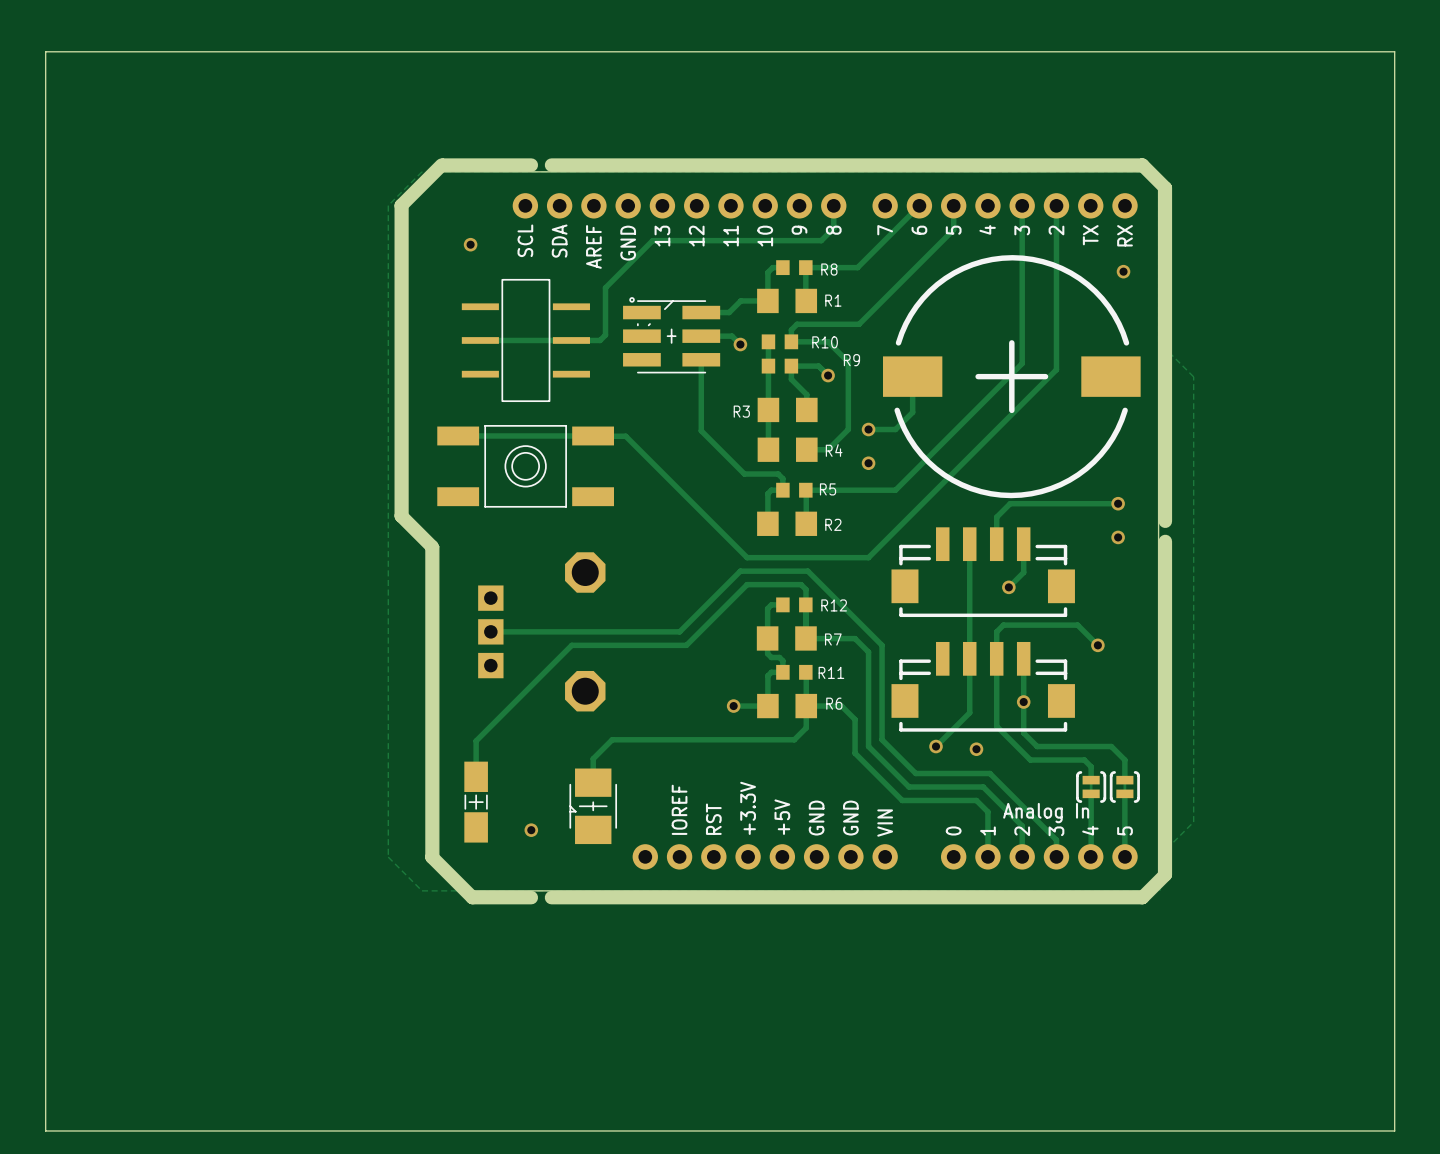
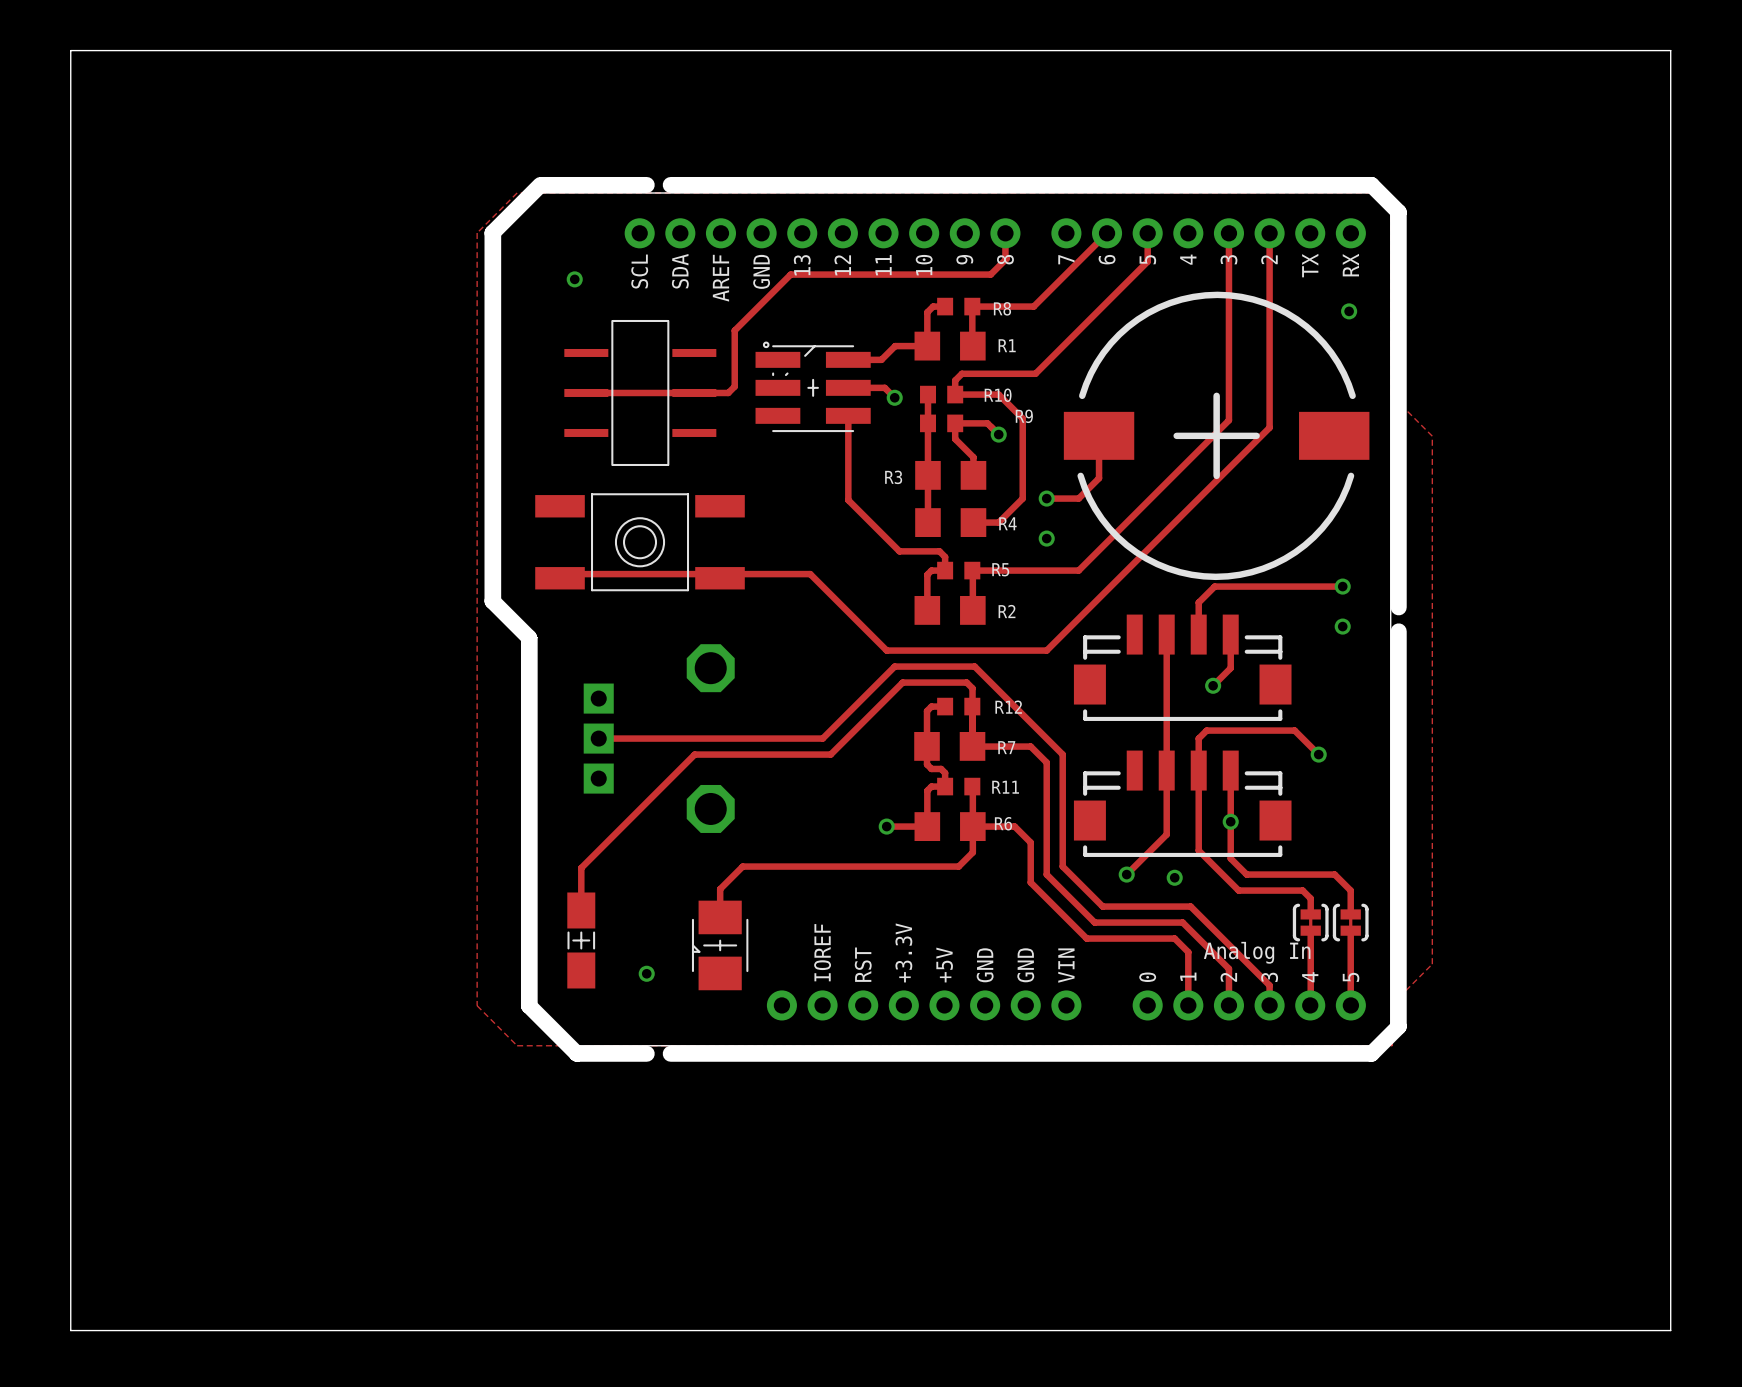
track: (458, 435) (625, 436) (747, 557) -> (559, 574) (810, 574) (886, 650) (902, 650)

